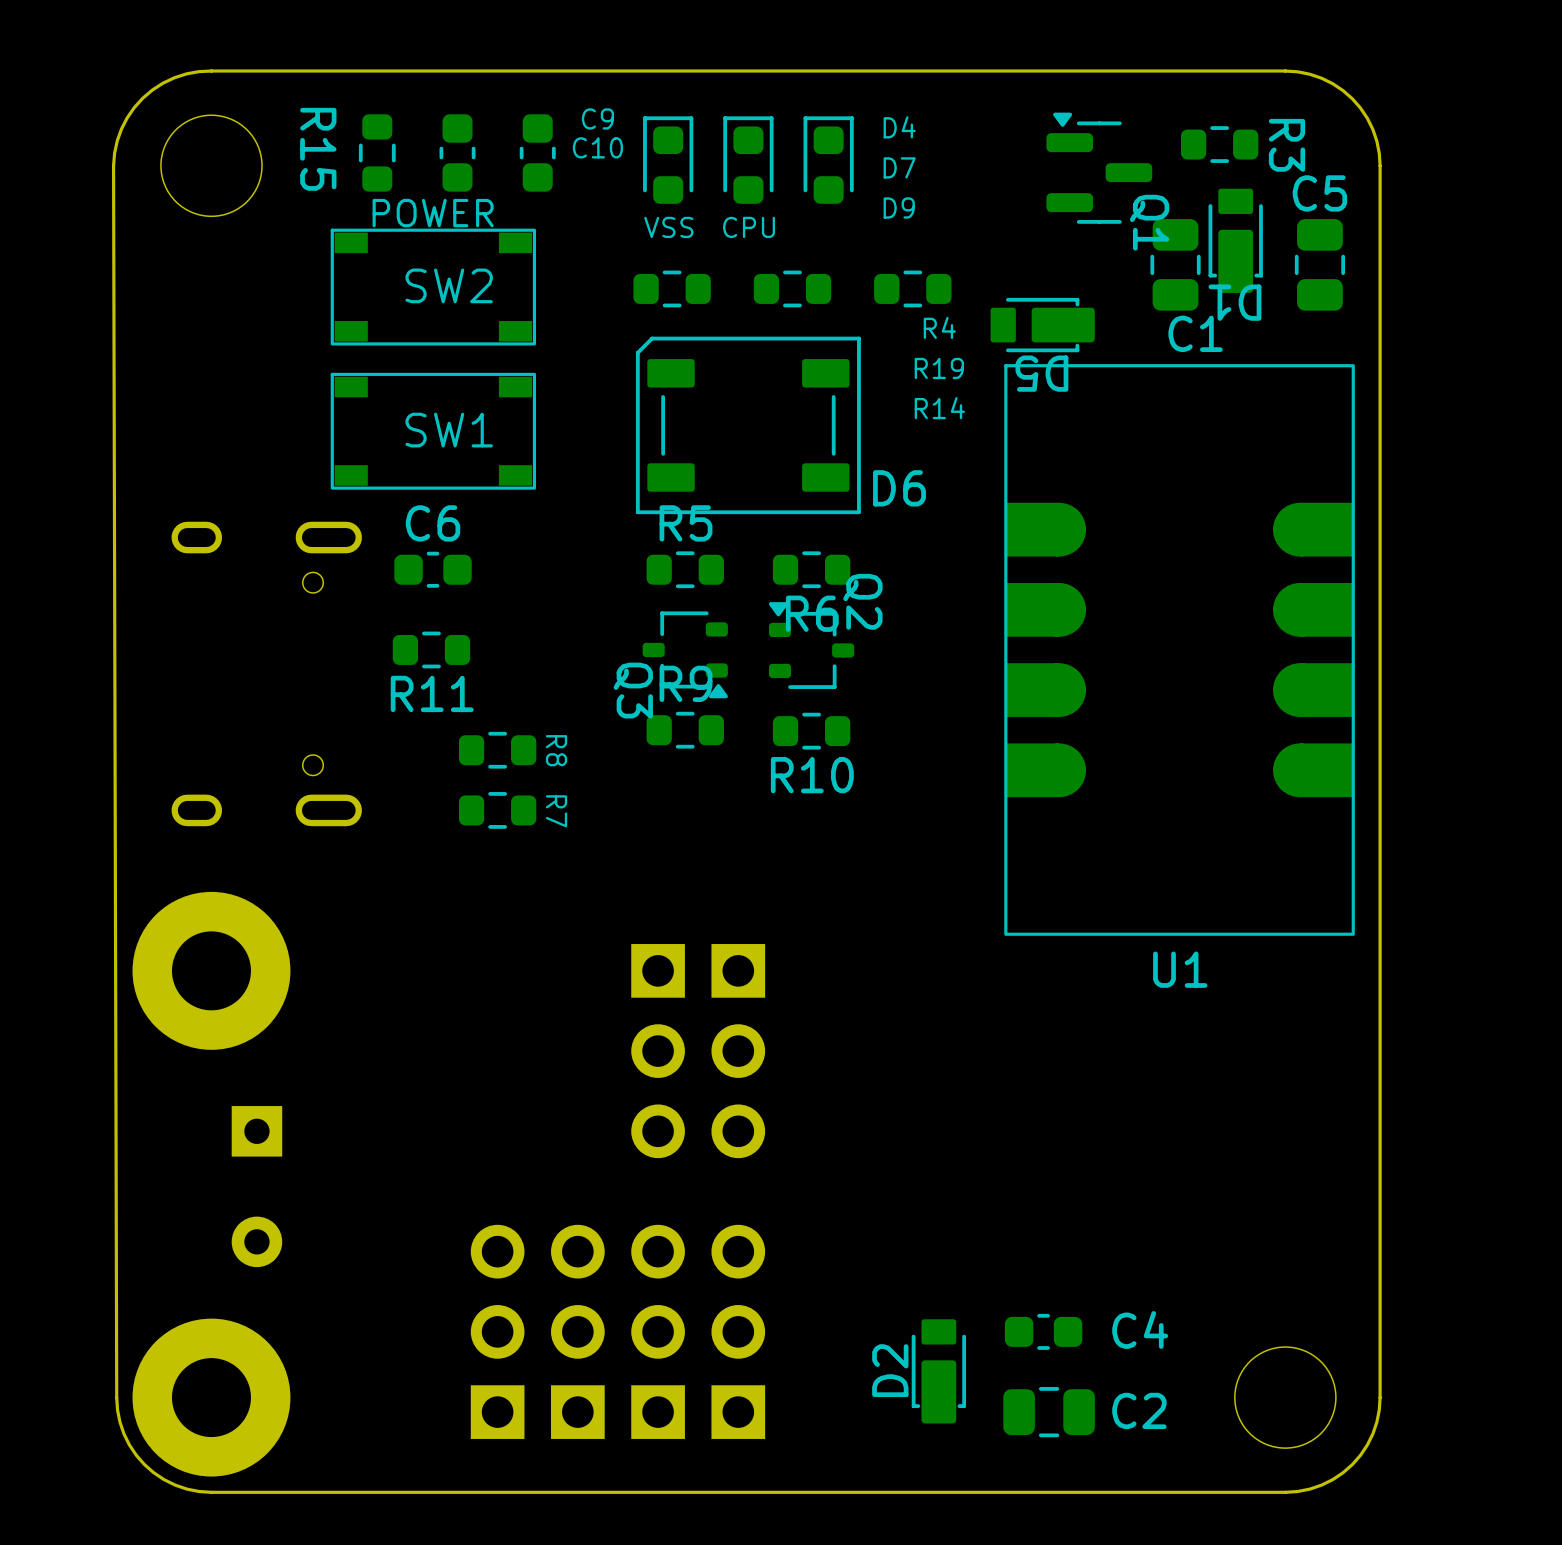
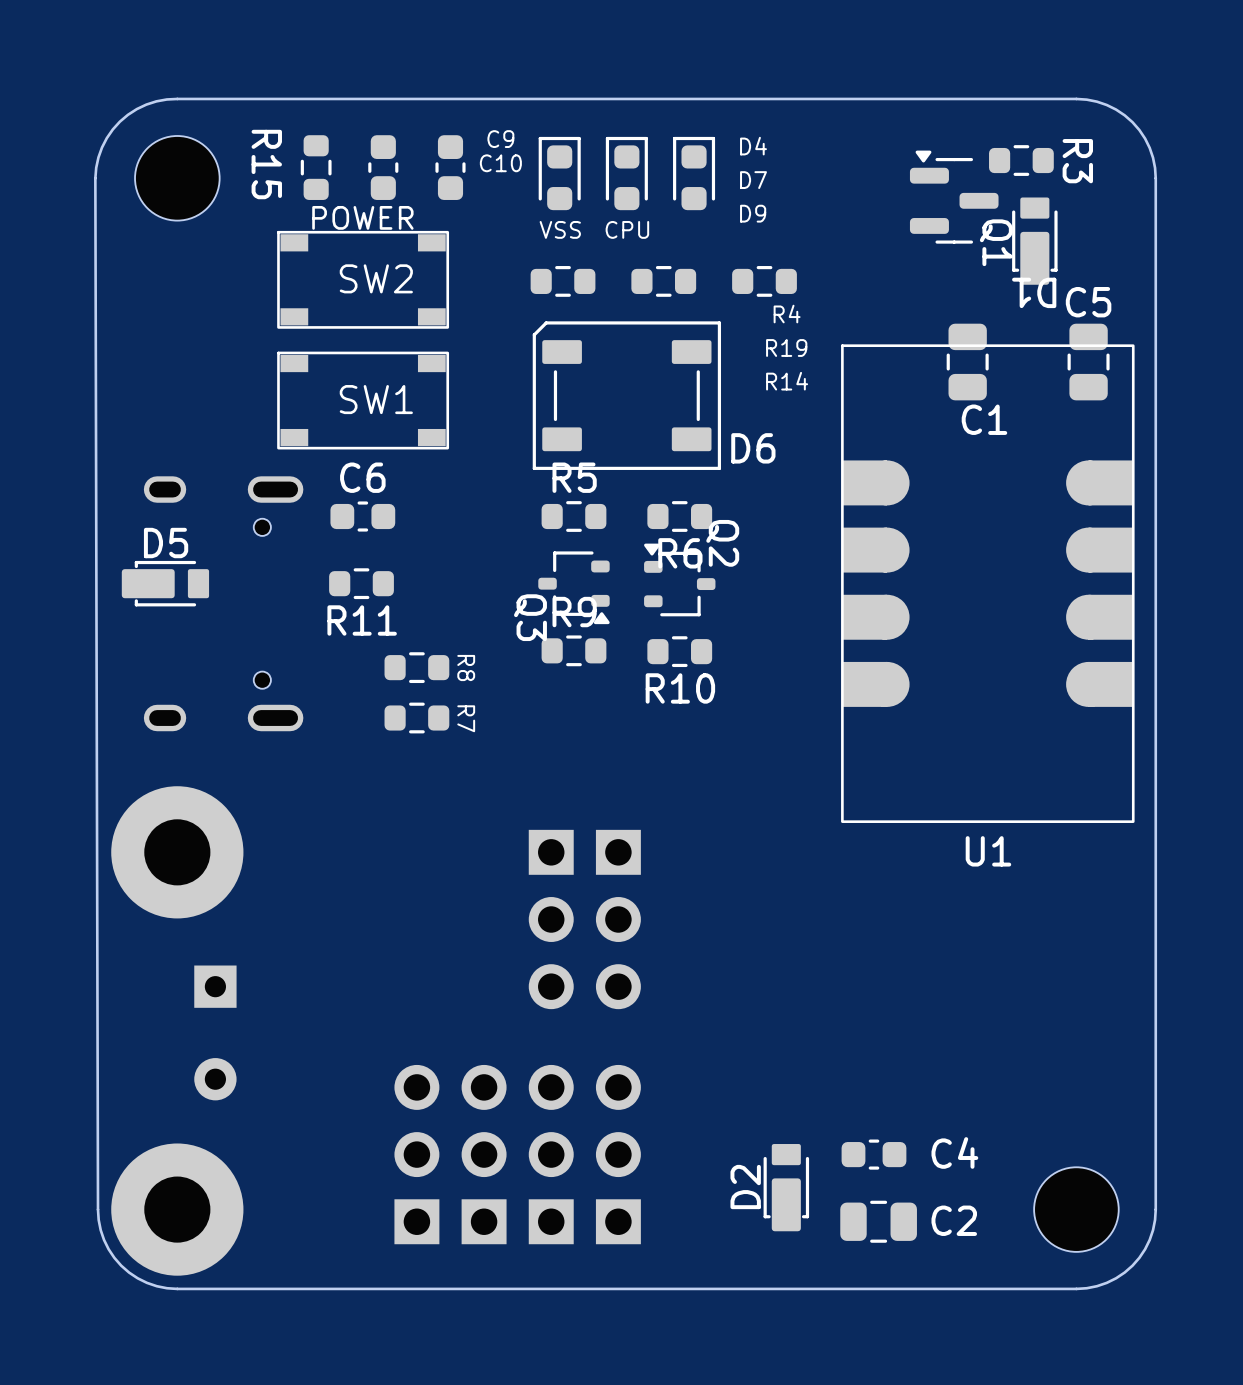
Q1 position: (1099, 168) -> (954, 197)
C1 position: (1175, 264) -> (967, 362)
C5 position: (1319, 264) -> (1088, 362)
D5 rotation: 0° (1042, 325) -> 180° (165, 583)
D5 position: (1042, 325) -> (165, 583)

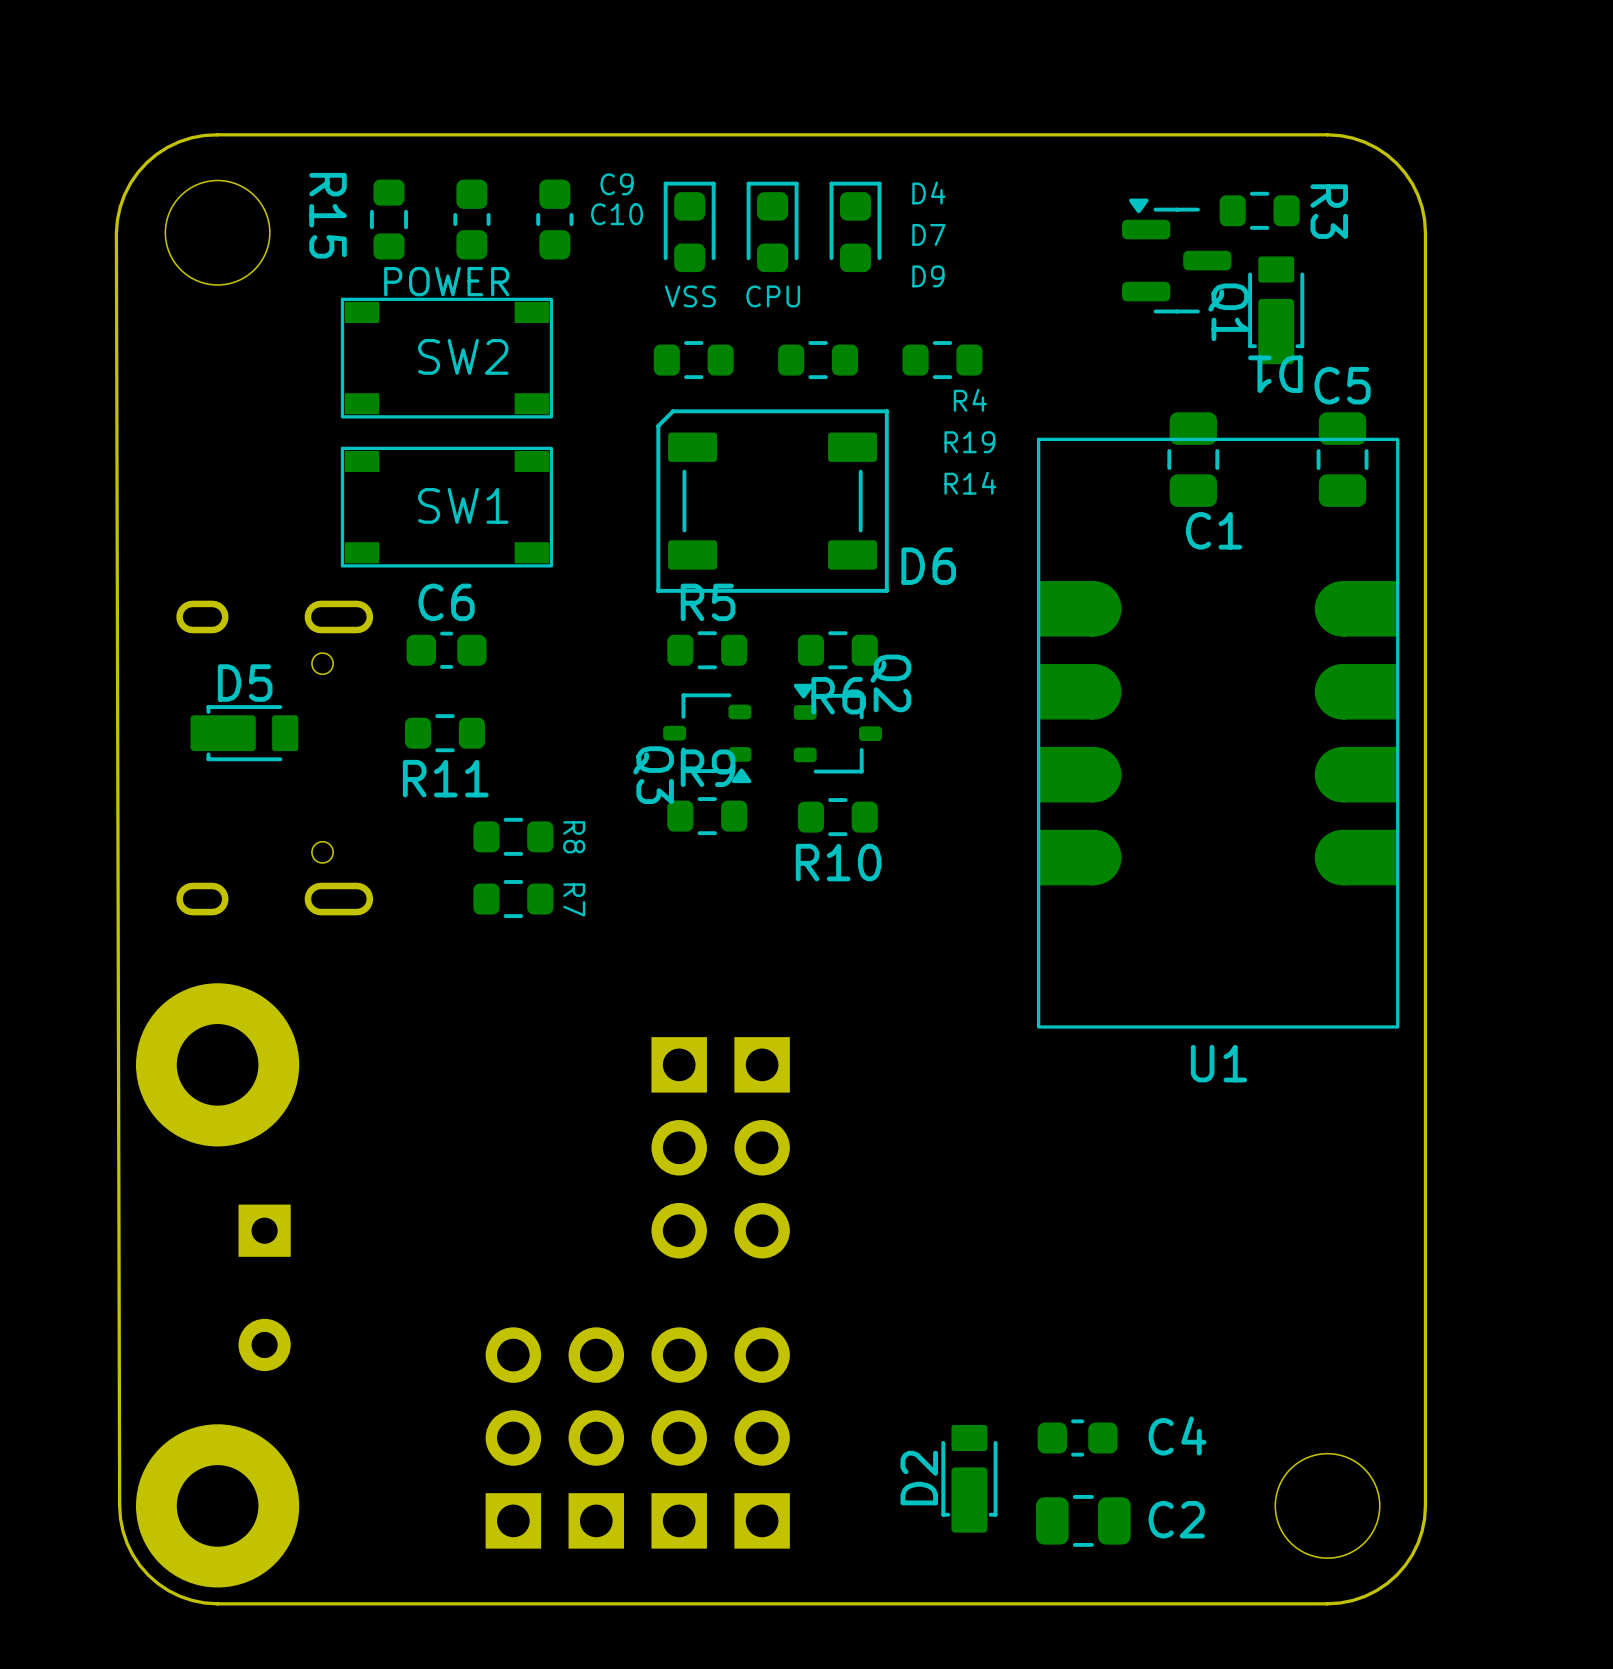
D5 position: (165, 583) -> (244, 733)

